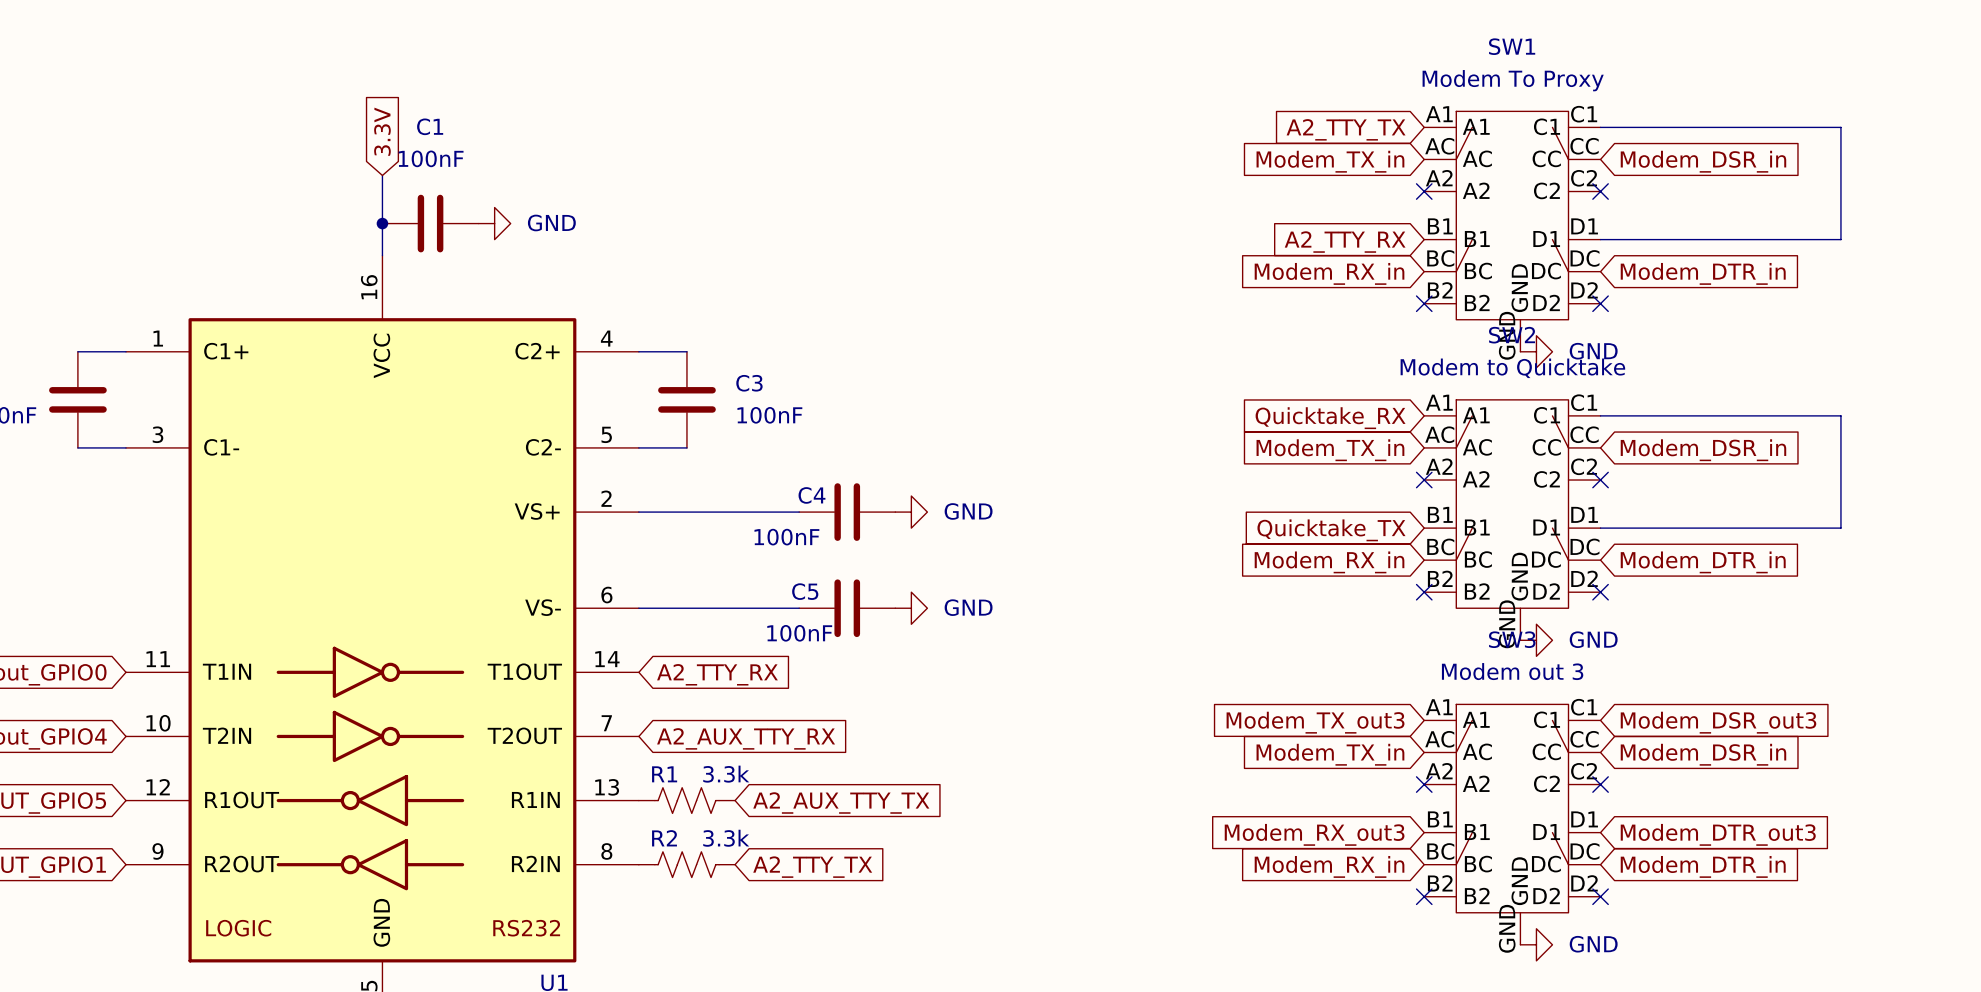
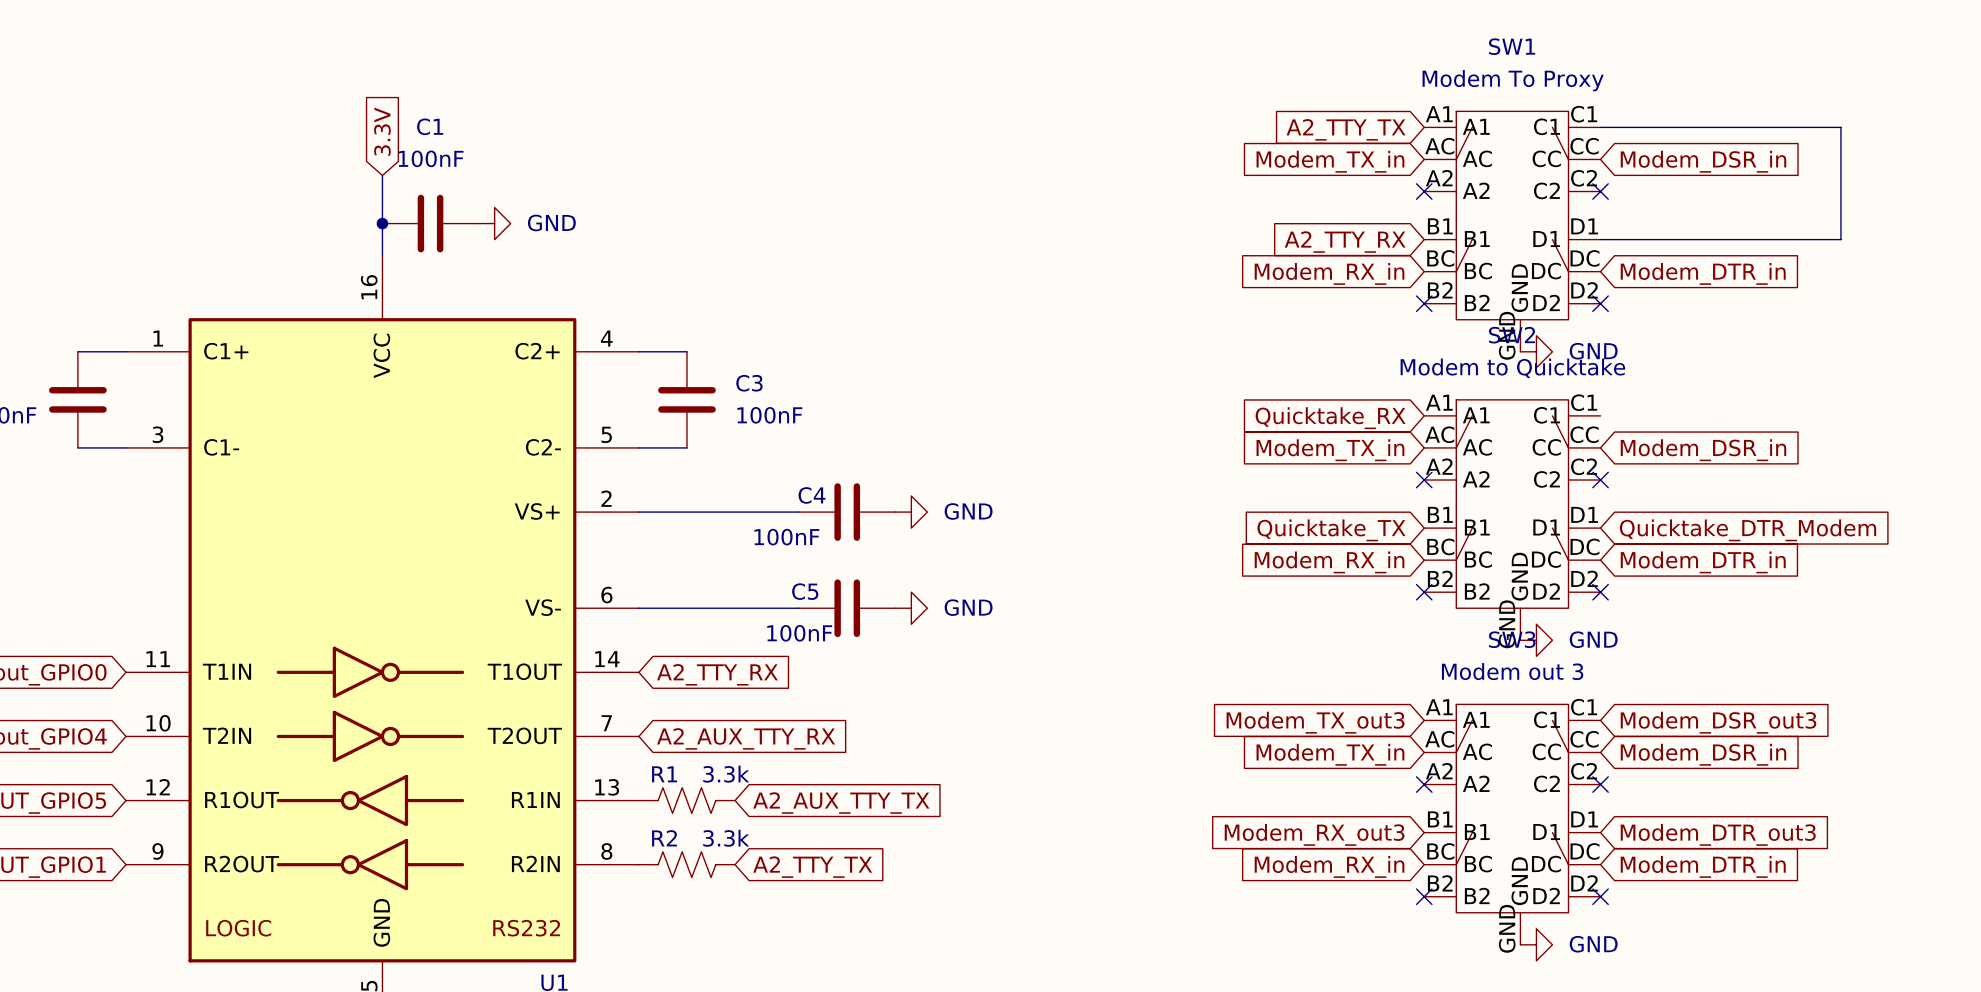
wire: (1600, 415) (1840, 415) (1840, 528) (1600, 528) -> none
global label: none -> Quicktake_DTR_Modem (1747, 530)

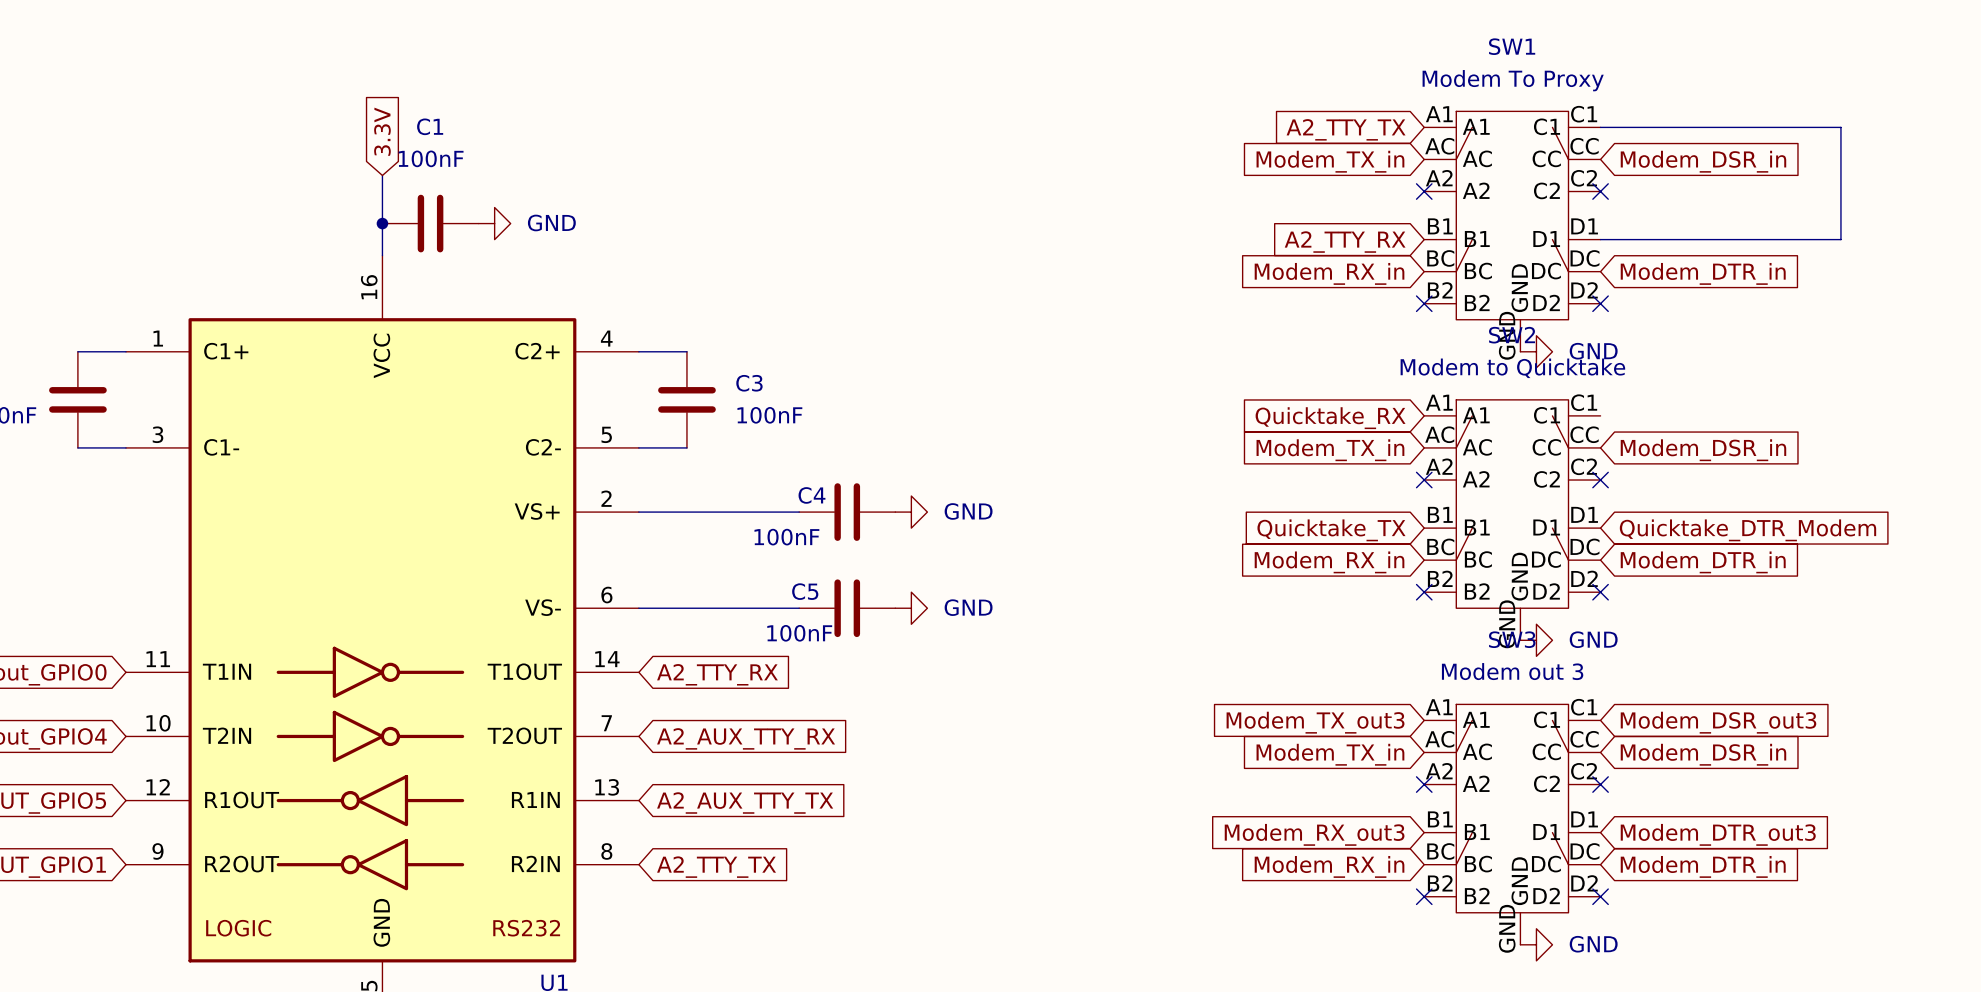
R1: 3.3k (686, 800) -> none
global label position: A2_AUX_TTY_TX (841, 803) -> A2_AUX_TTY_TX (745, 803)
R2: 3.3k (686, 864) -> none
global label position: A2_TTY_TX (812, 867) -> A2_TTY_TX (716, 867)

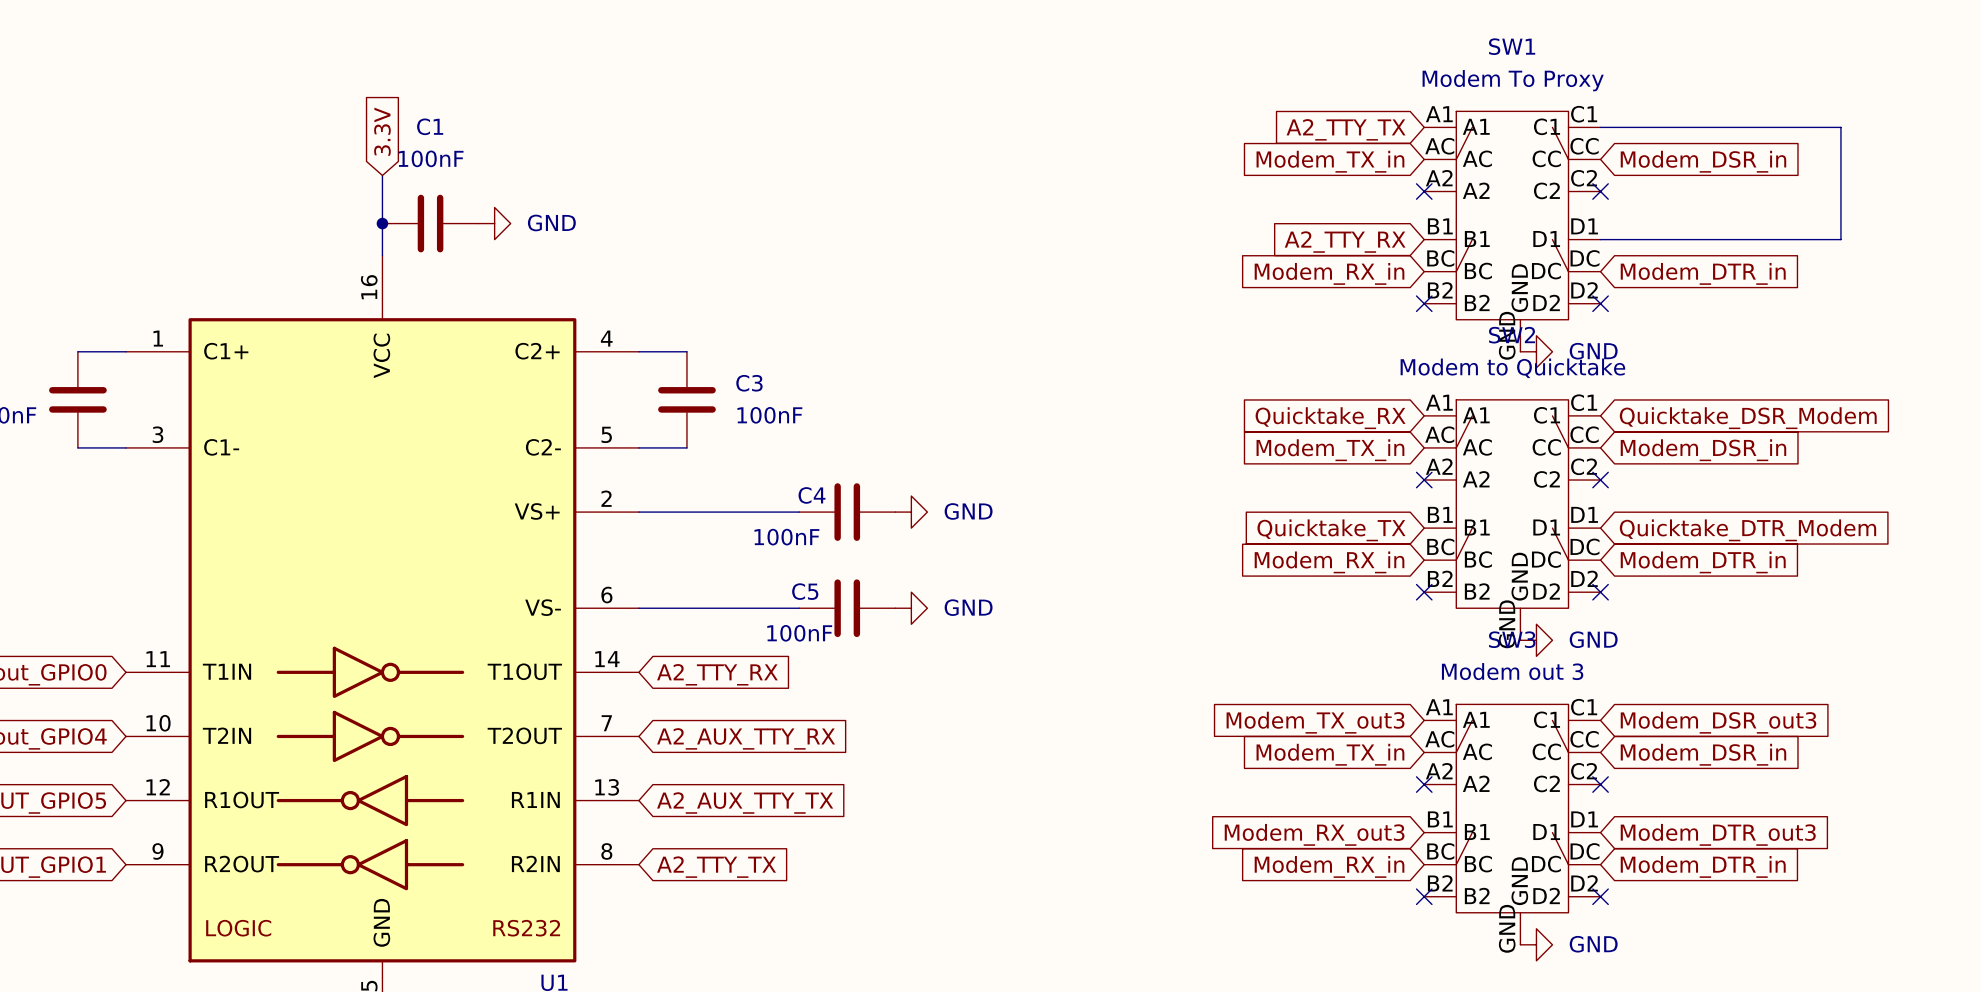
global label: none -> Quicktake_DSR_Modem (1748, 418)

